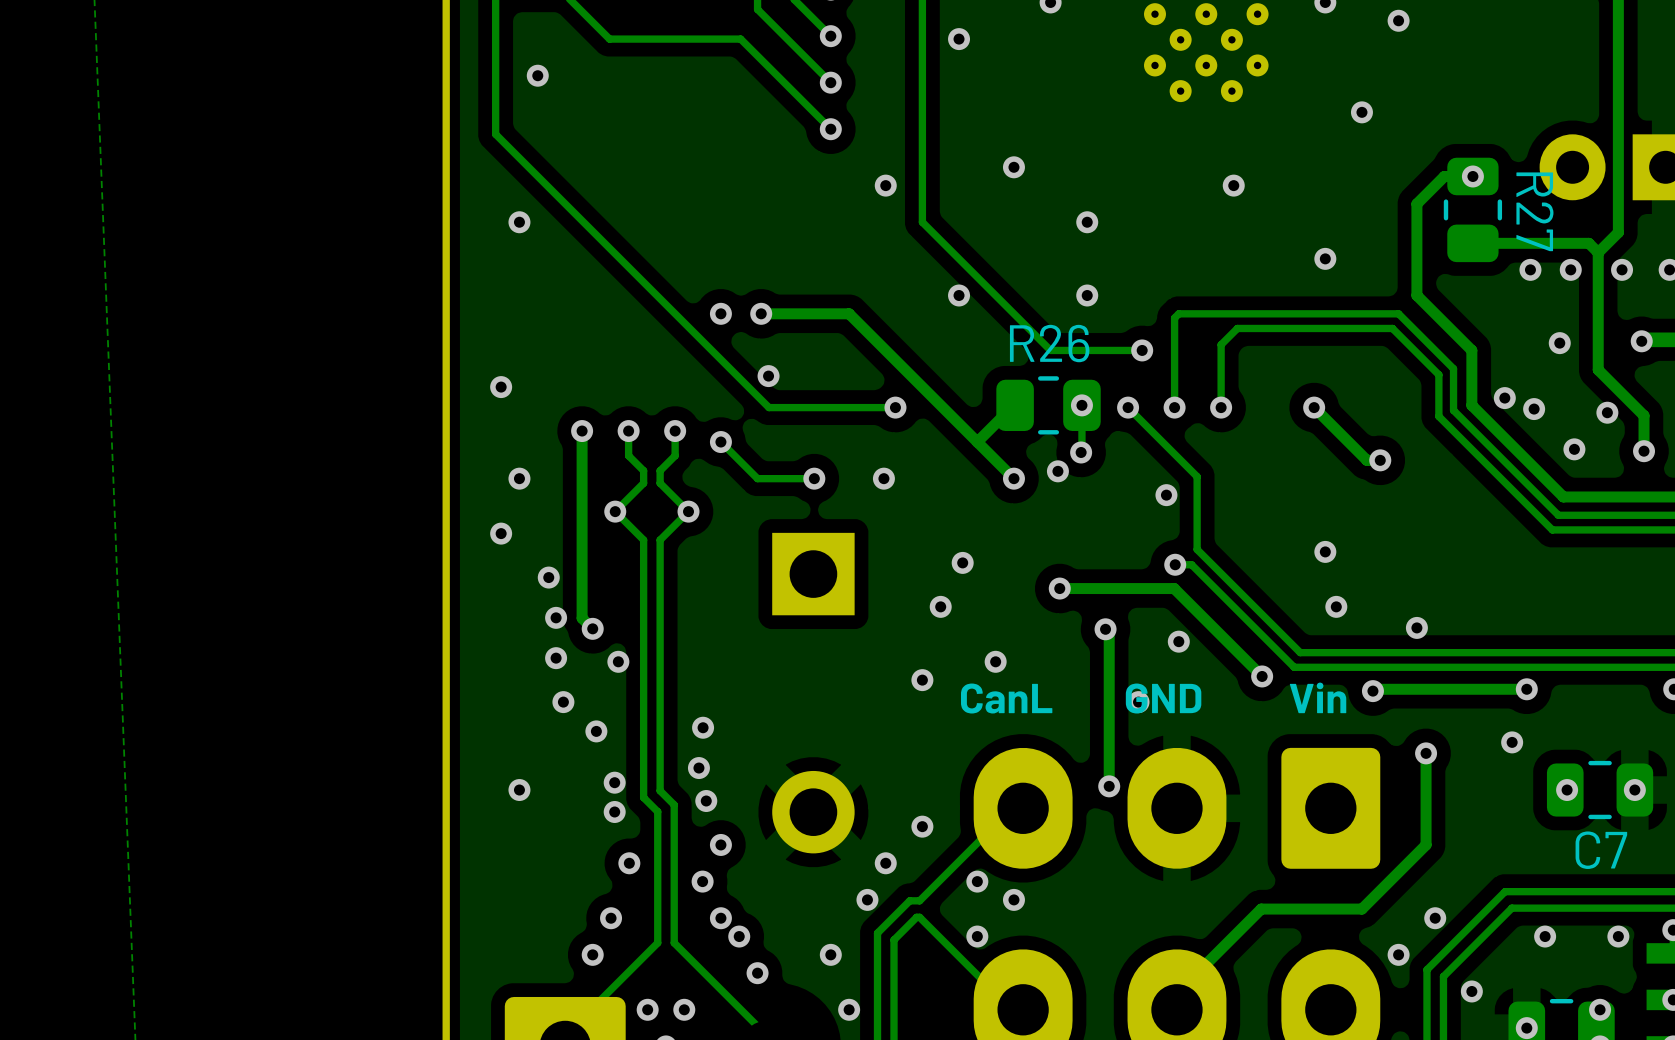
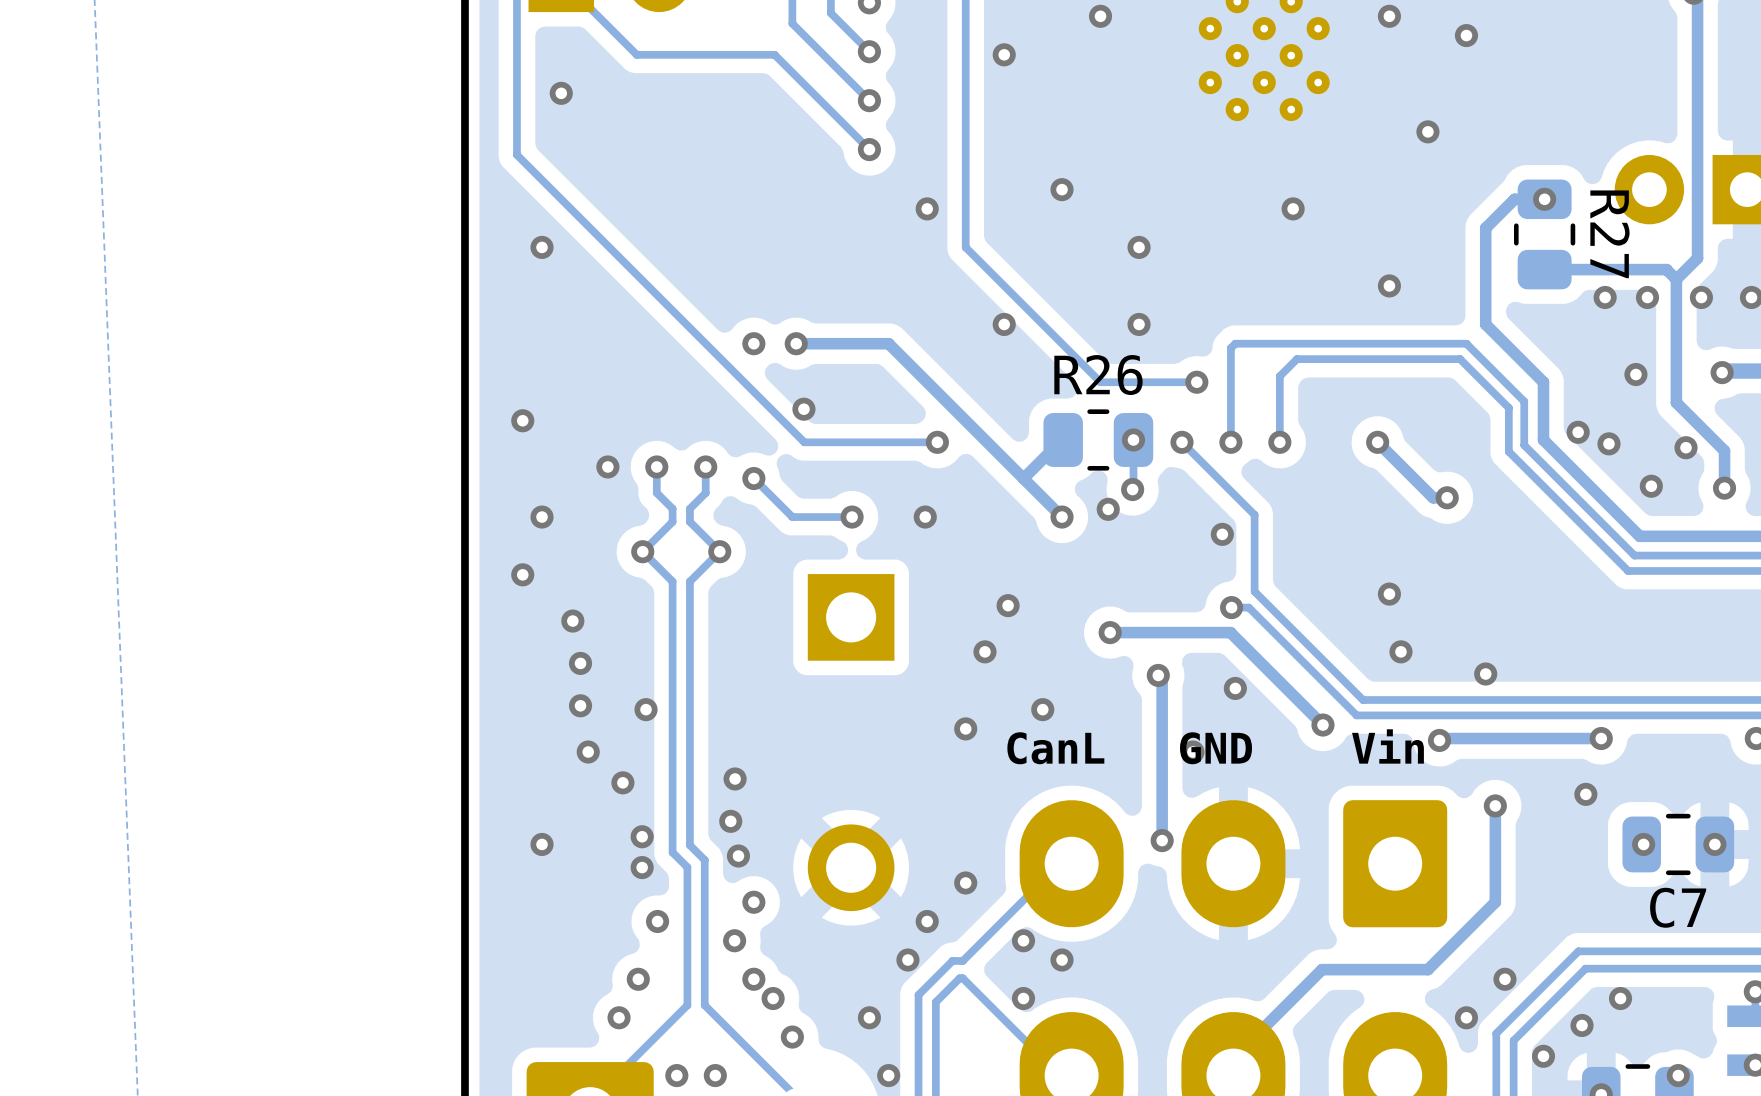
track: (582, 431) (582, 618) (592, 628) -> none
via: (592, 628) -> none
via position: (1618, 936) -> (1582, 1025)

